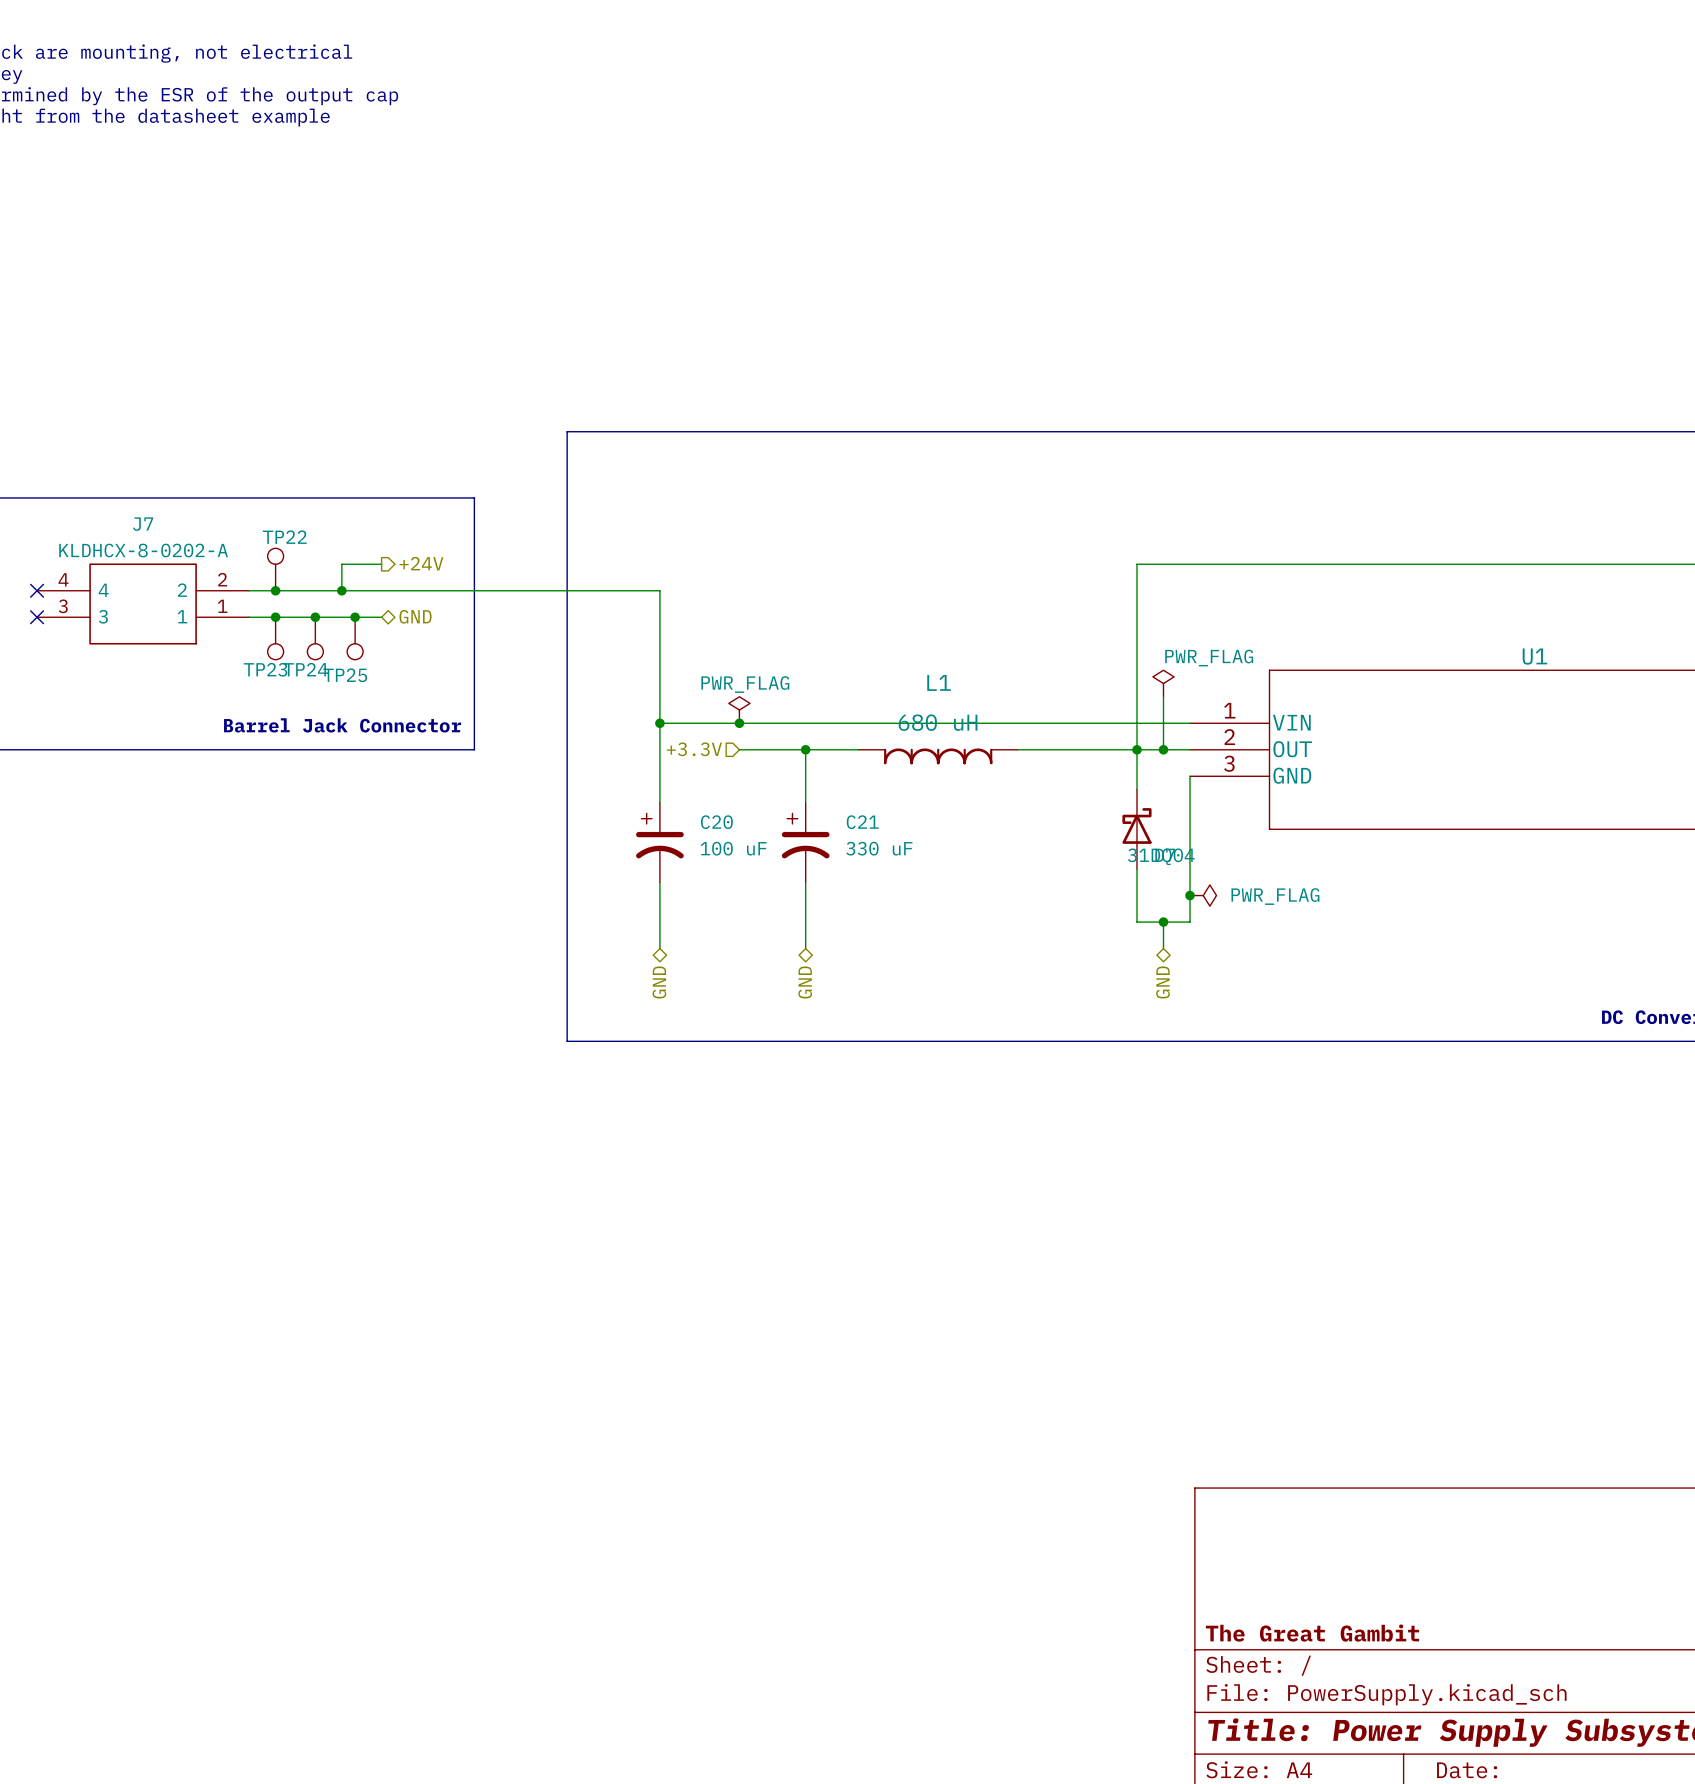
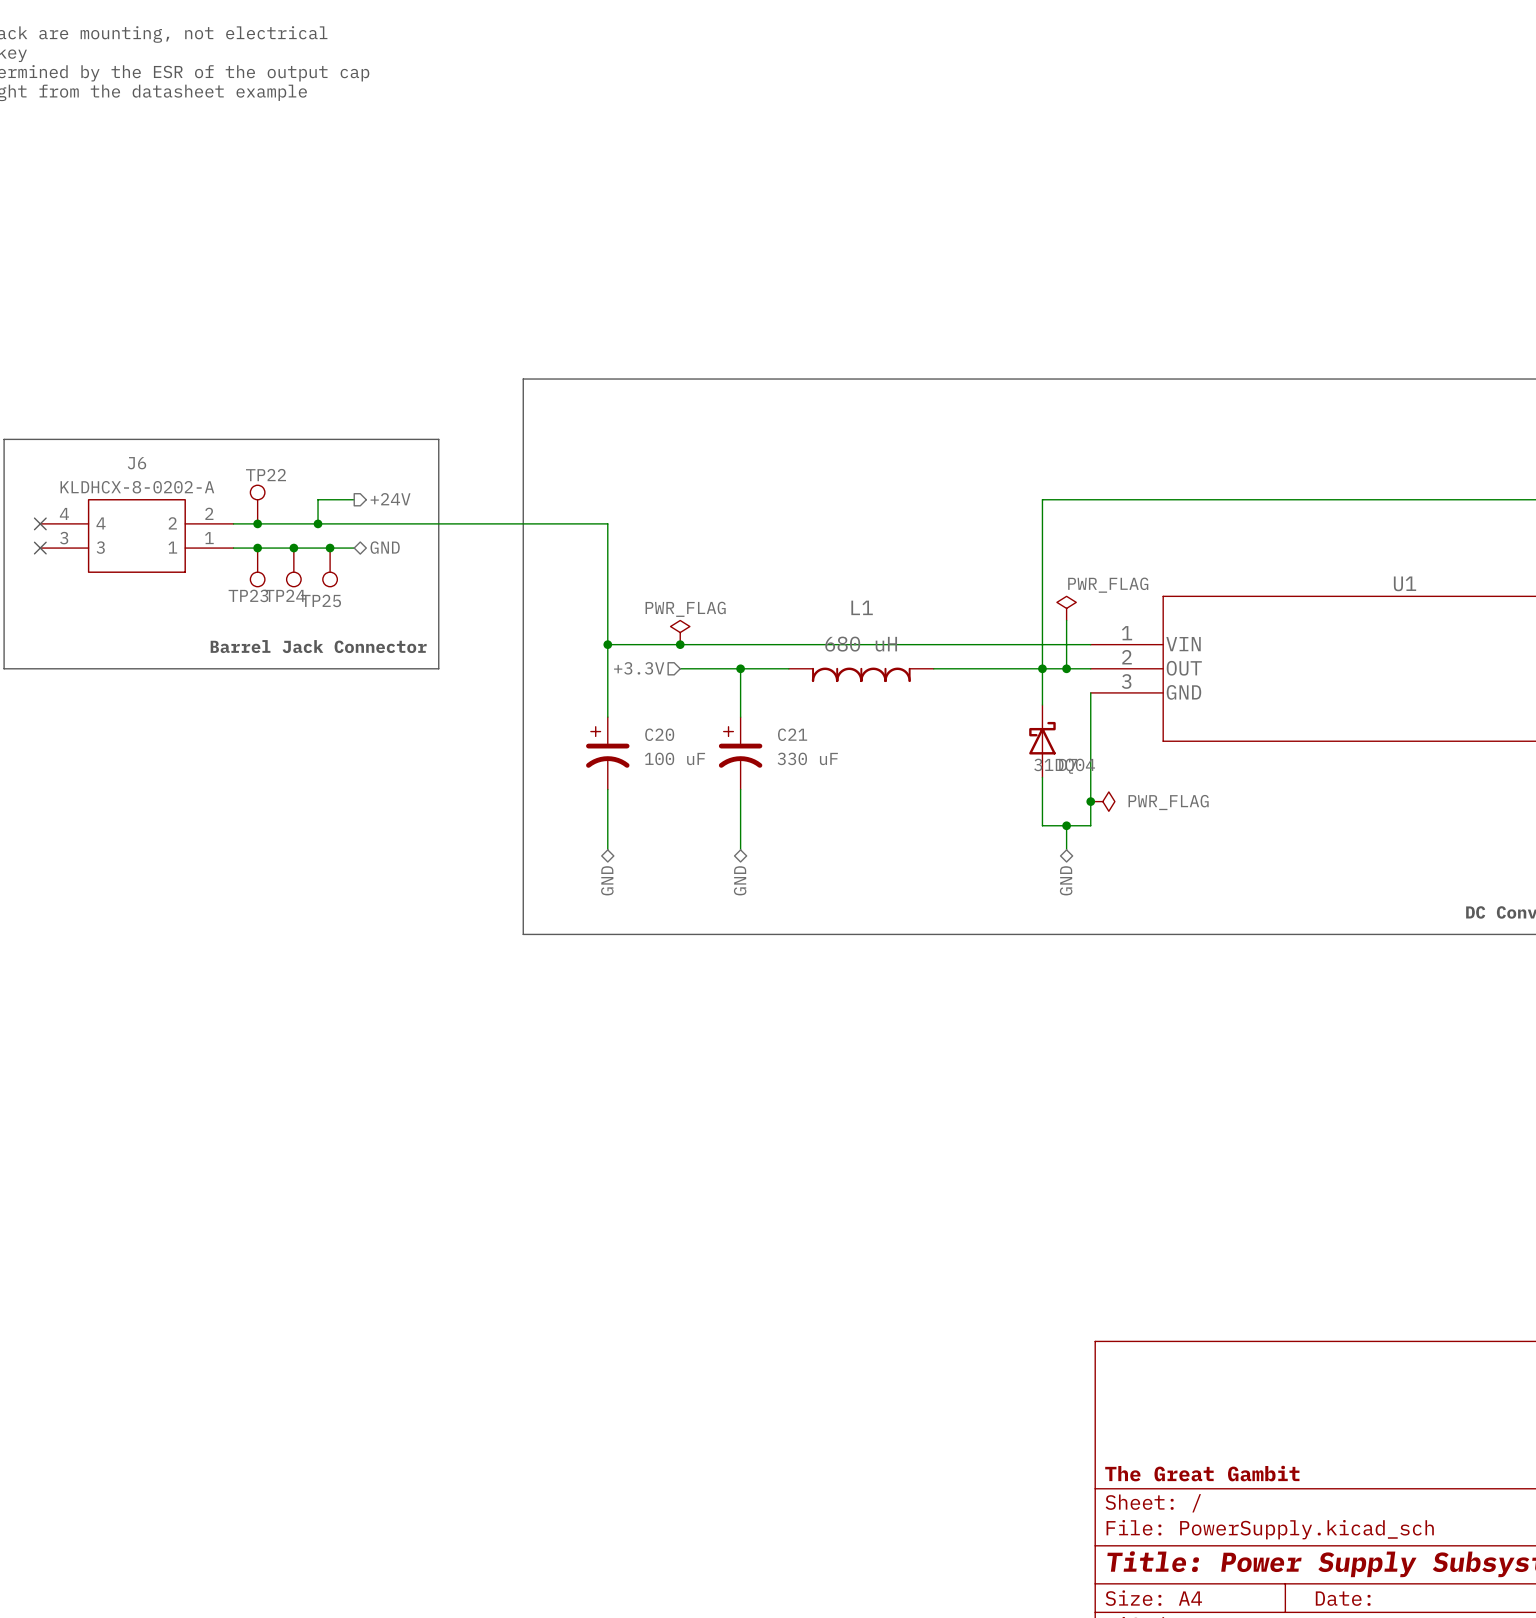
J7 name: J7 (143, 524) -> J6 (136, 463)

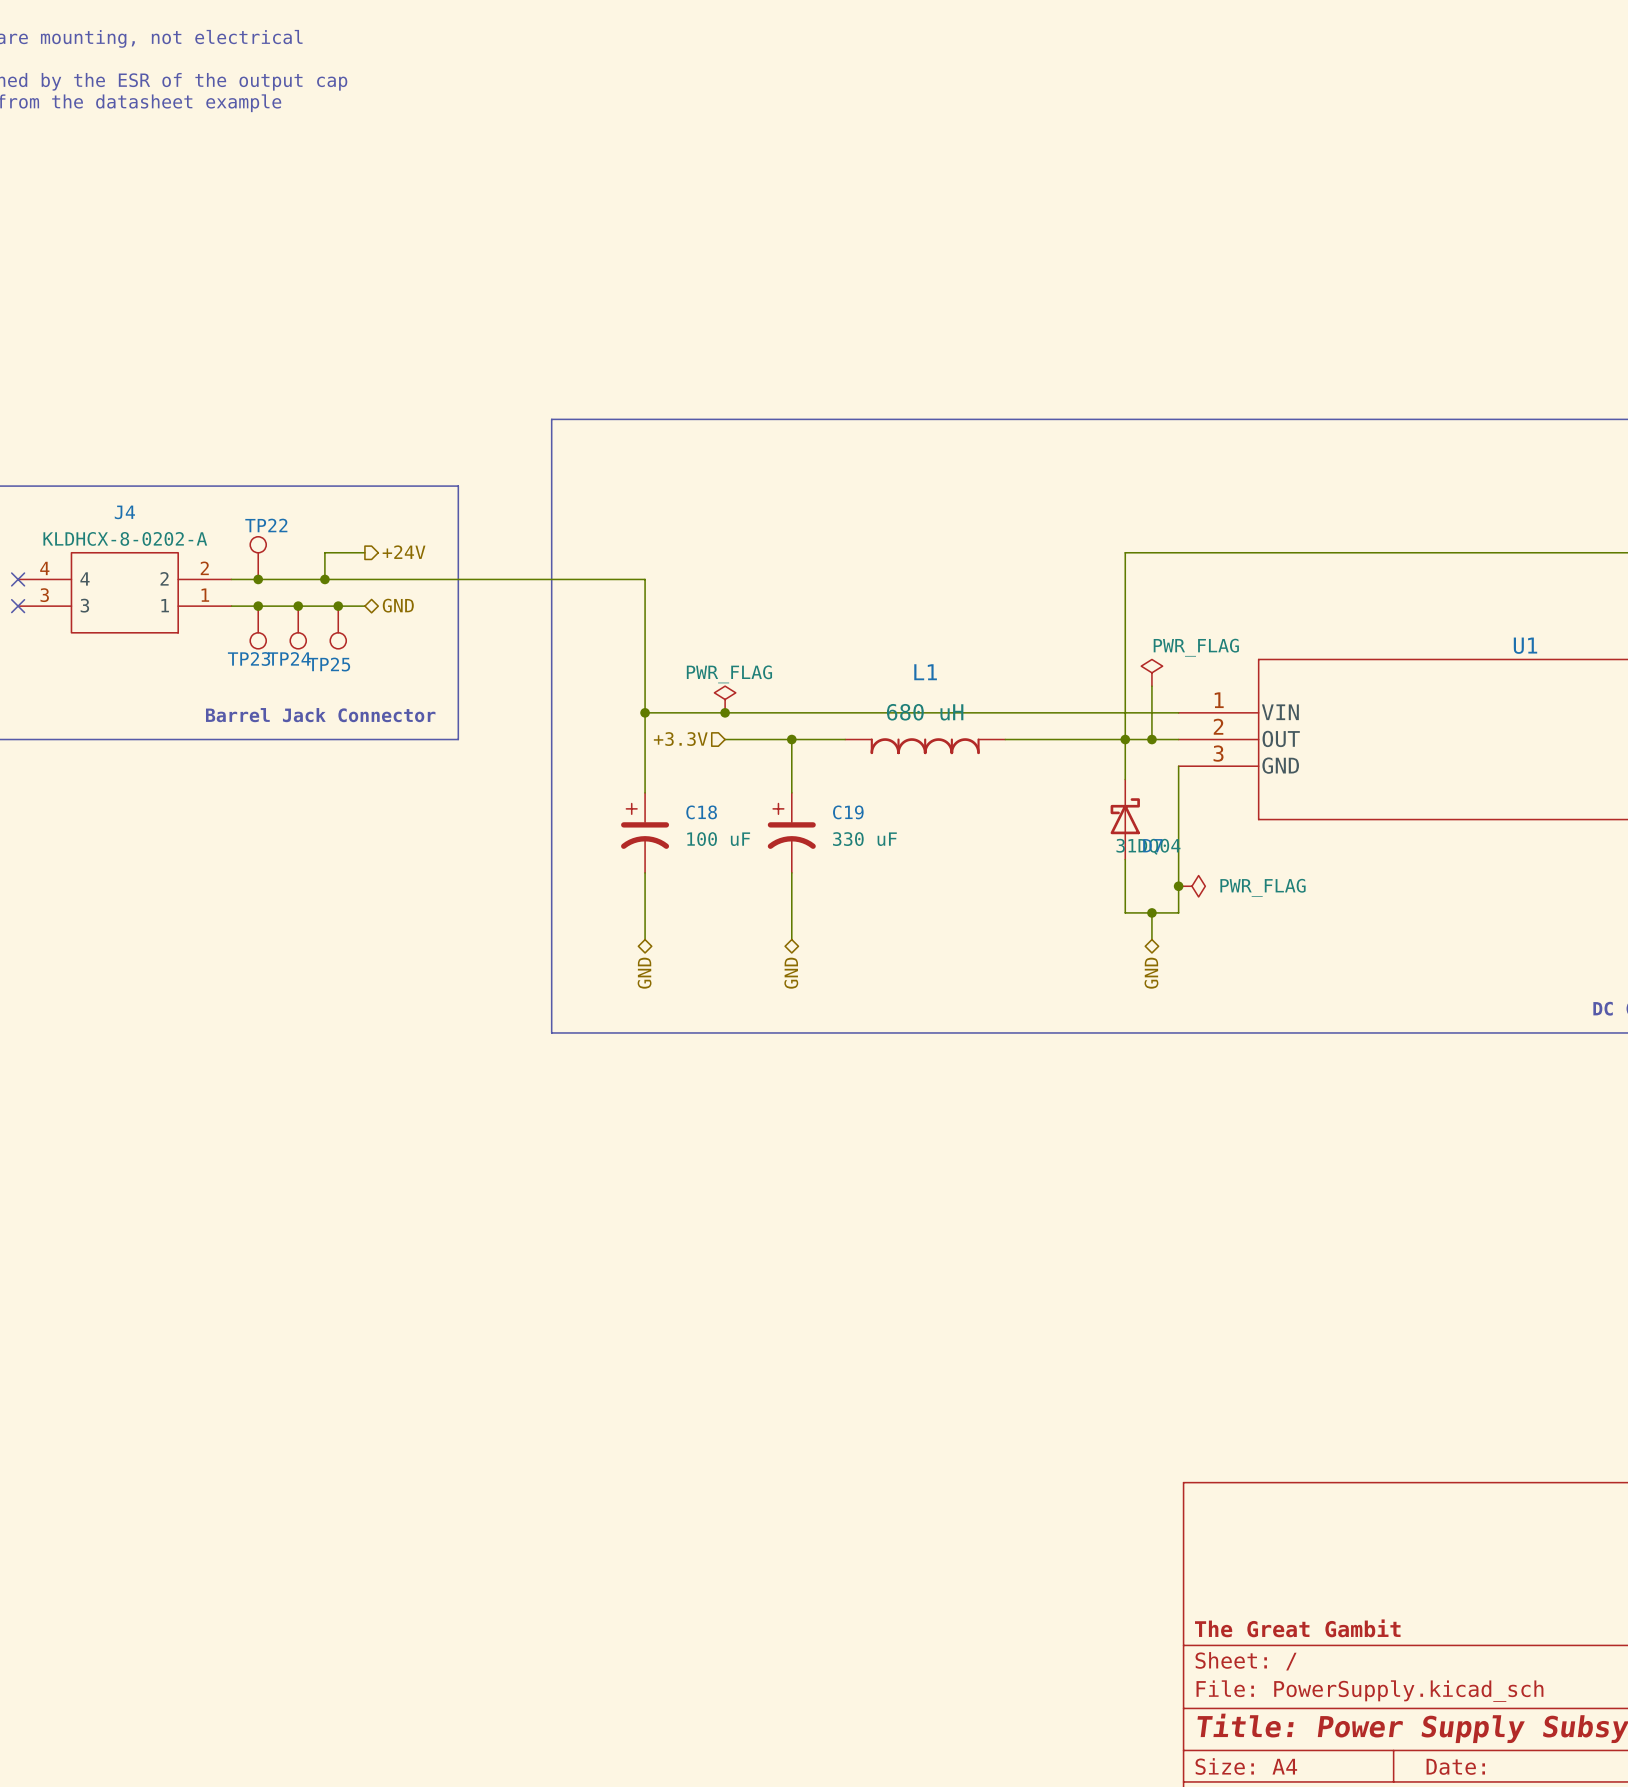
J6 name: J6 (136, 463) -> J4 (124, 512)
C20 name: C20 (659, 734) -> C18 (701, 812)
C21 name: C21 (792, 734) -> C19 (848, 812)

